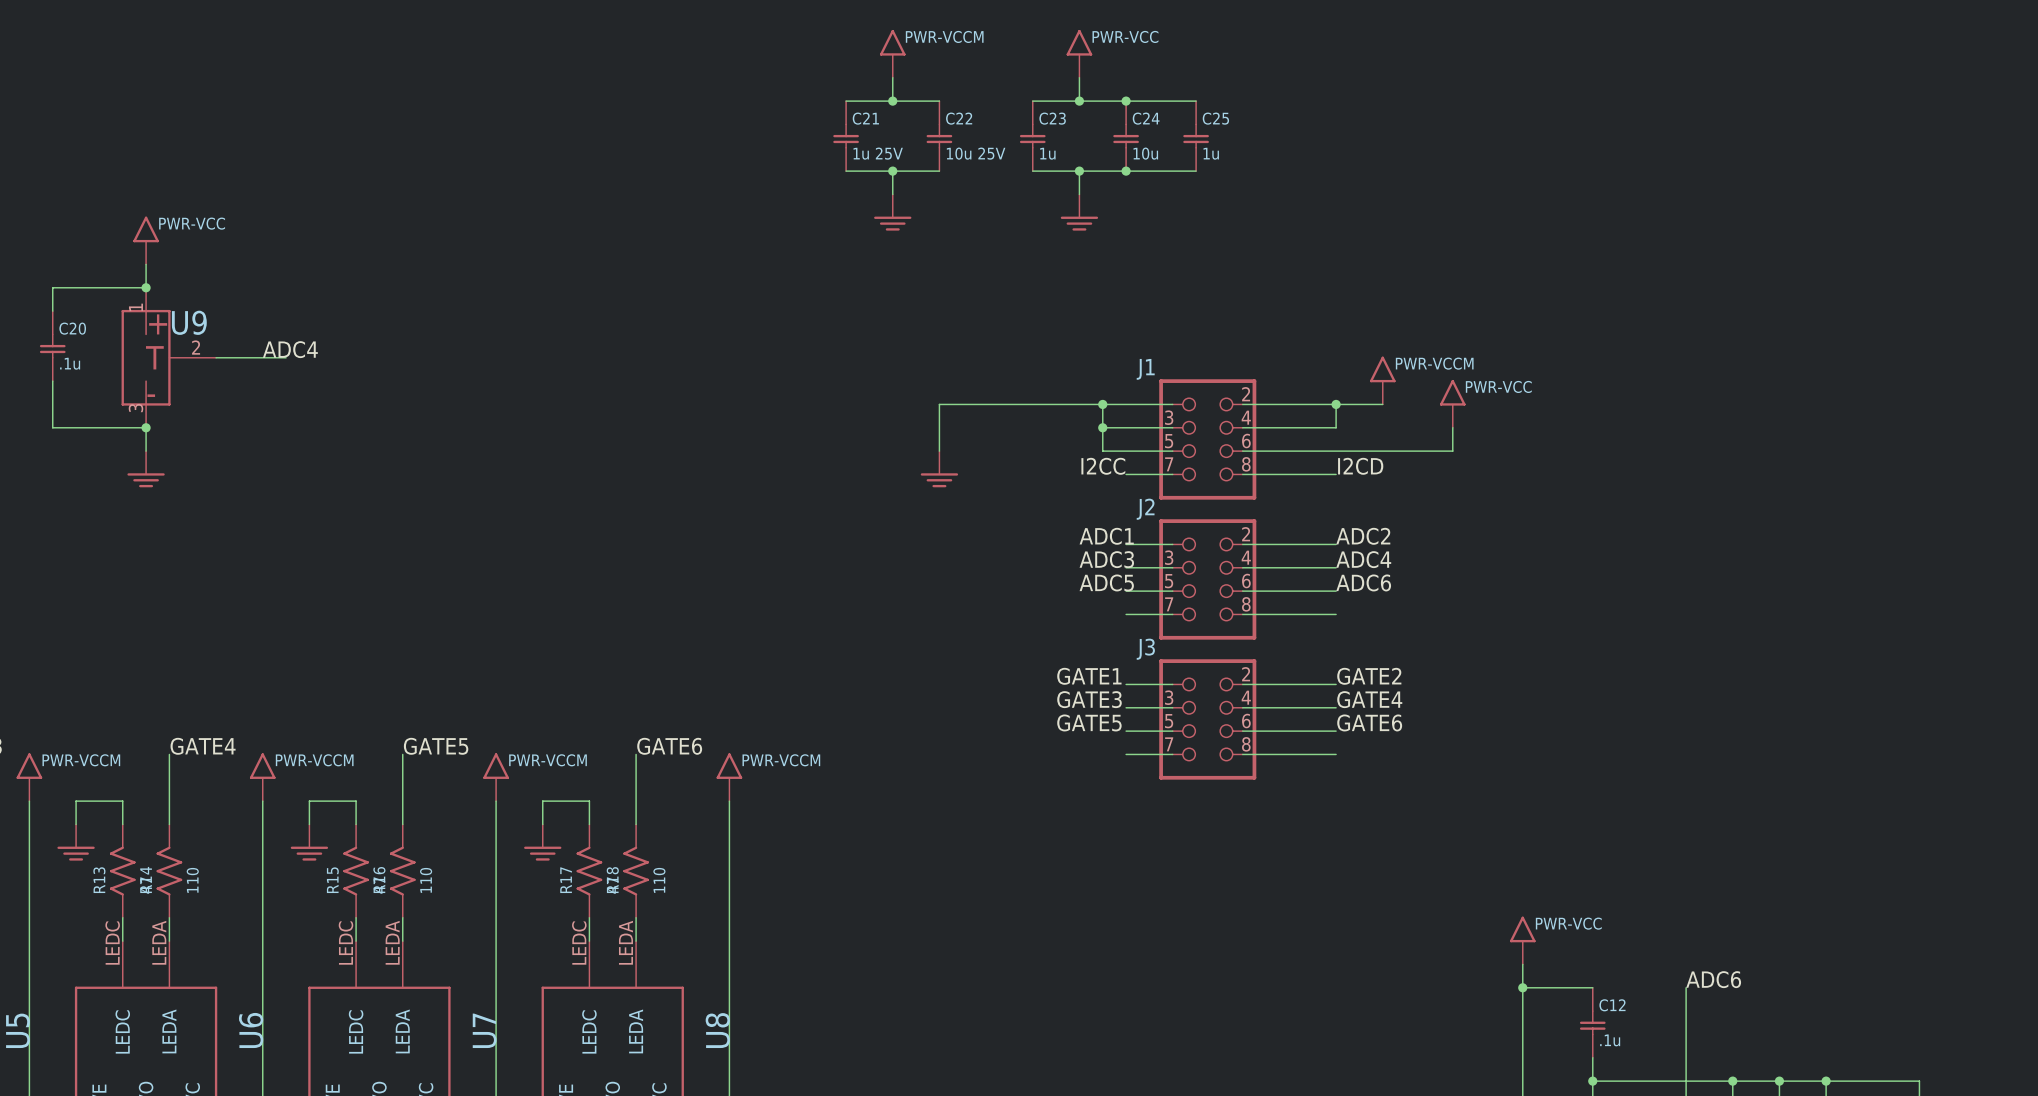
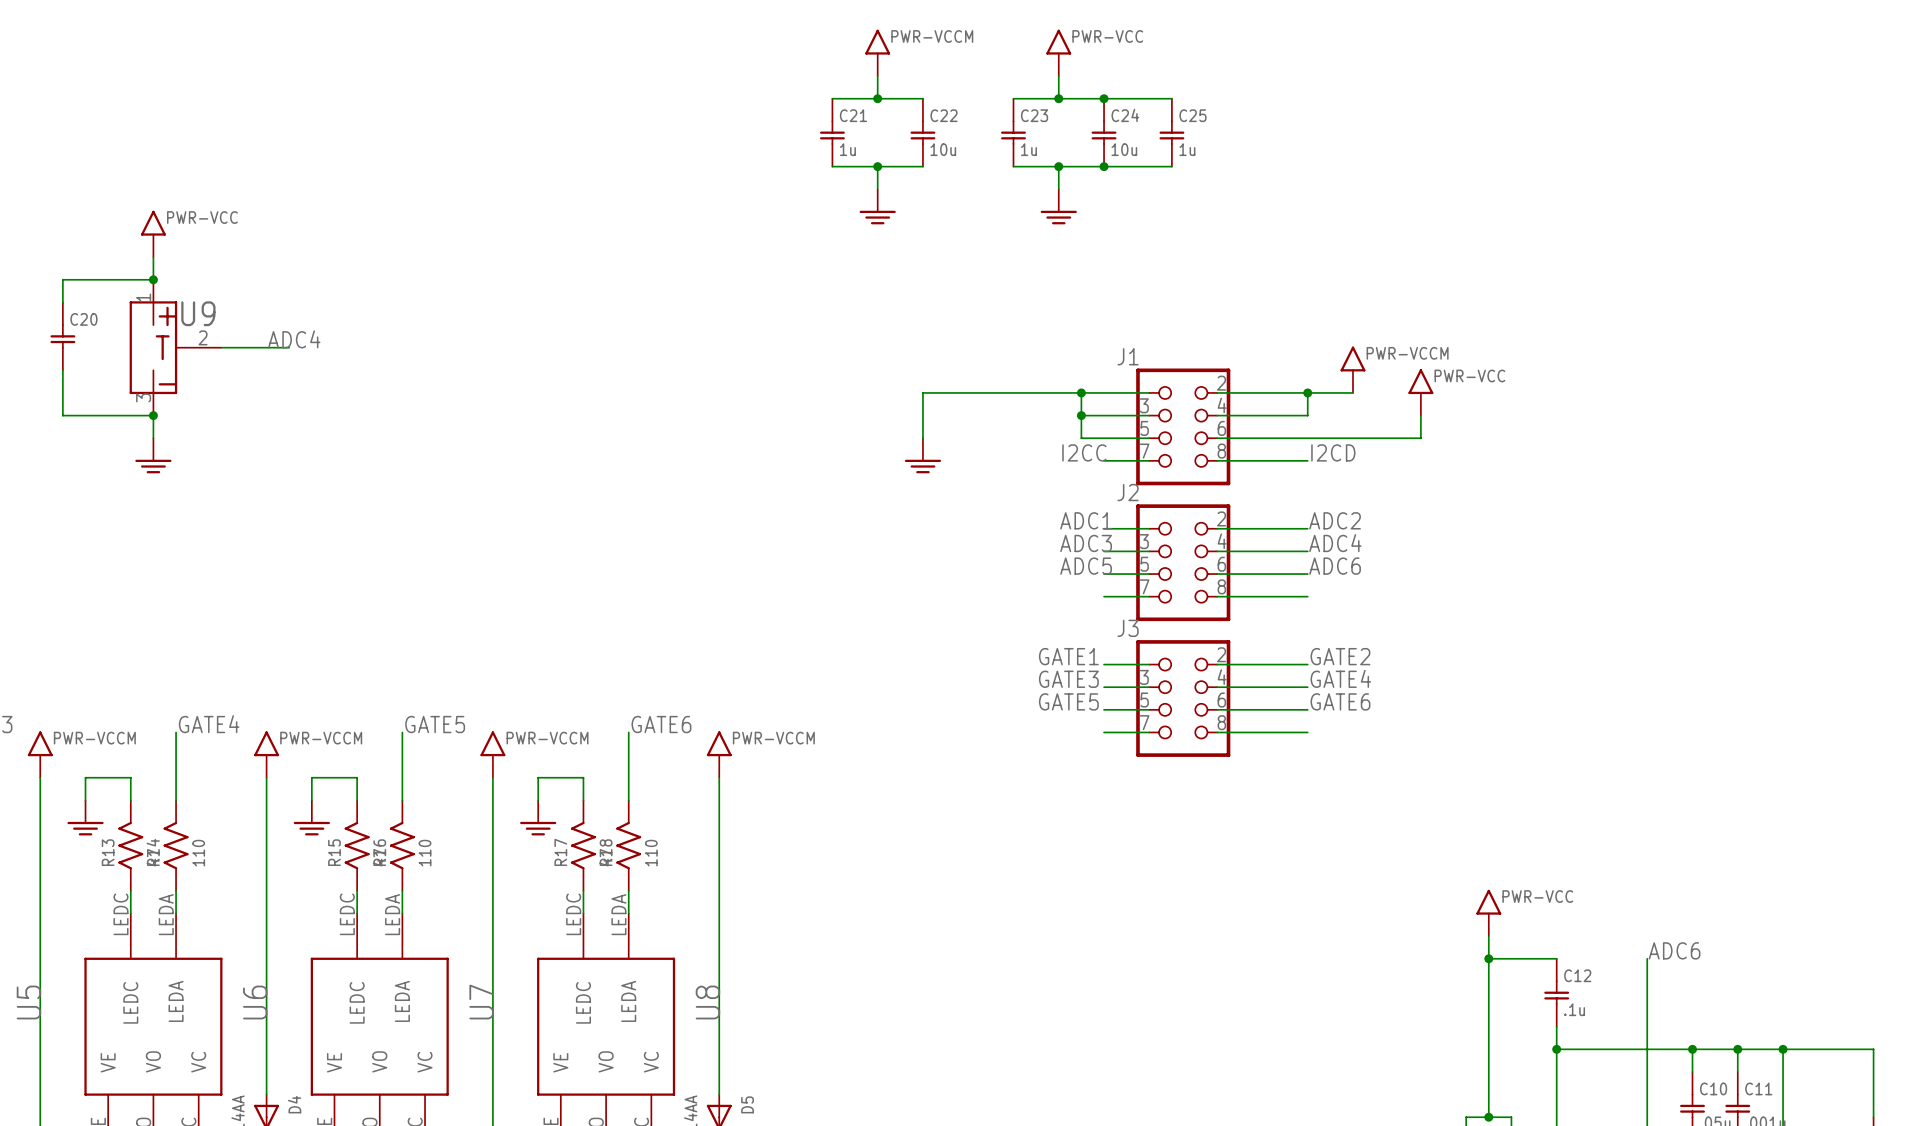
C21 value: 1u 25V (878, 153) -> 1u (847, 149)
C22 value: 10u 25V (976, 153) -> 10u (943, 149)
C20 value: .1u (70, 363) -> none

